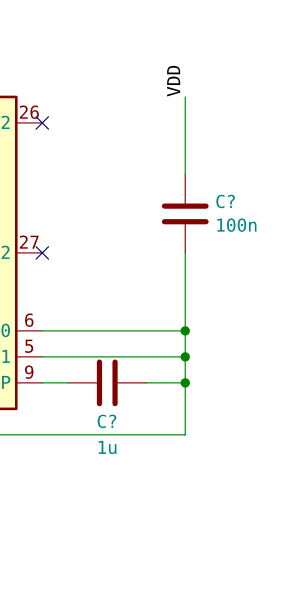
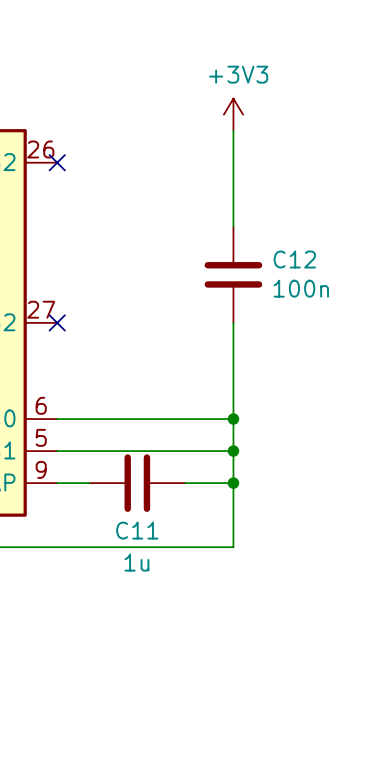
label: VDD (173, 81) -> none
power symbol: none -> +3V3 (233, 114)
C? name: C? (225, 201) -> C12 (294, 259)
C? name: C? (107, 421) -> C11 (137, 530)

